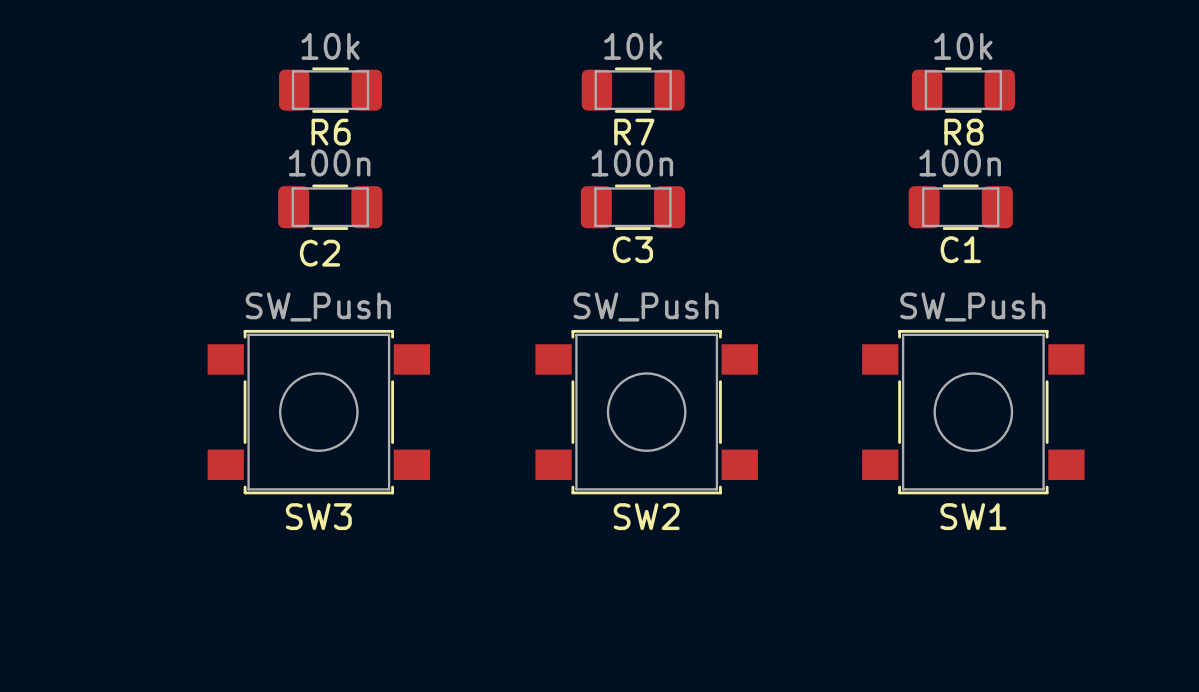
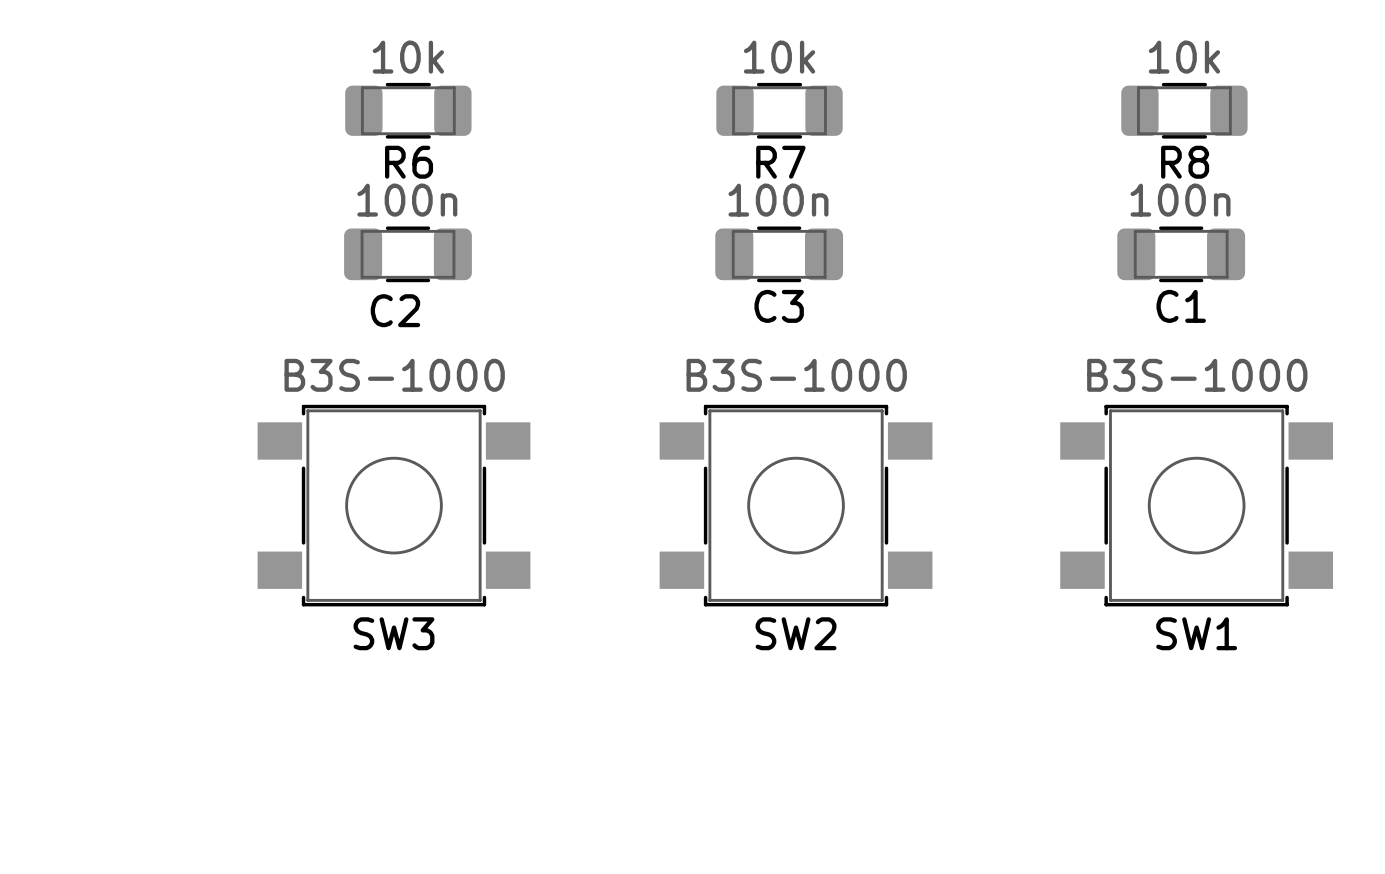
SW3 value: SW_Push (318, 306) -> B3S-1000 (394, 375)
SW2 value: SW_Push (646, 306) -> B3S-1000 (796, 375)
SW1 value: SW_Push (972, 306) -> B3S-1000 (1197, 375)

